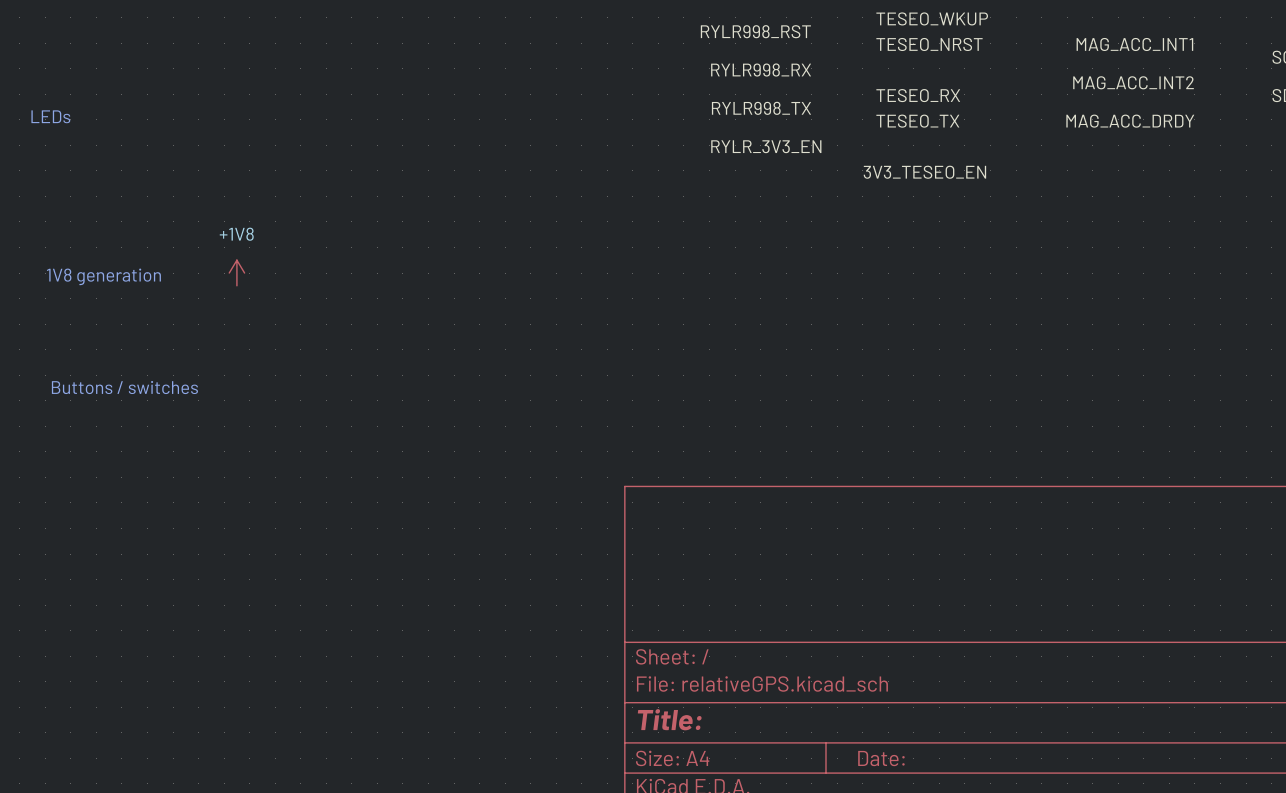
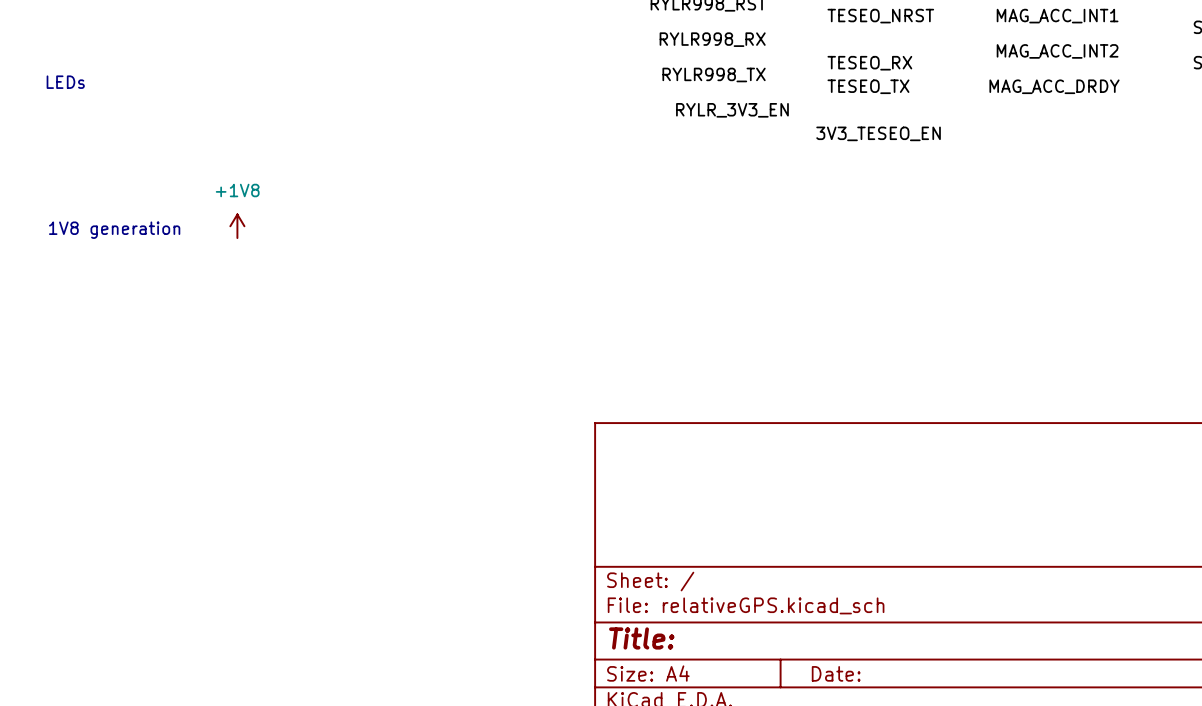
text: Buttons / switches (124, 387) -> none

